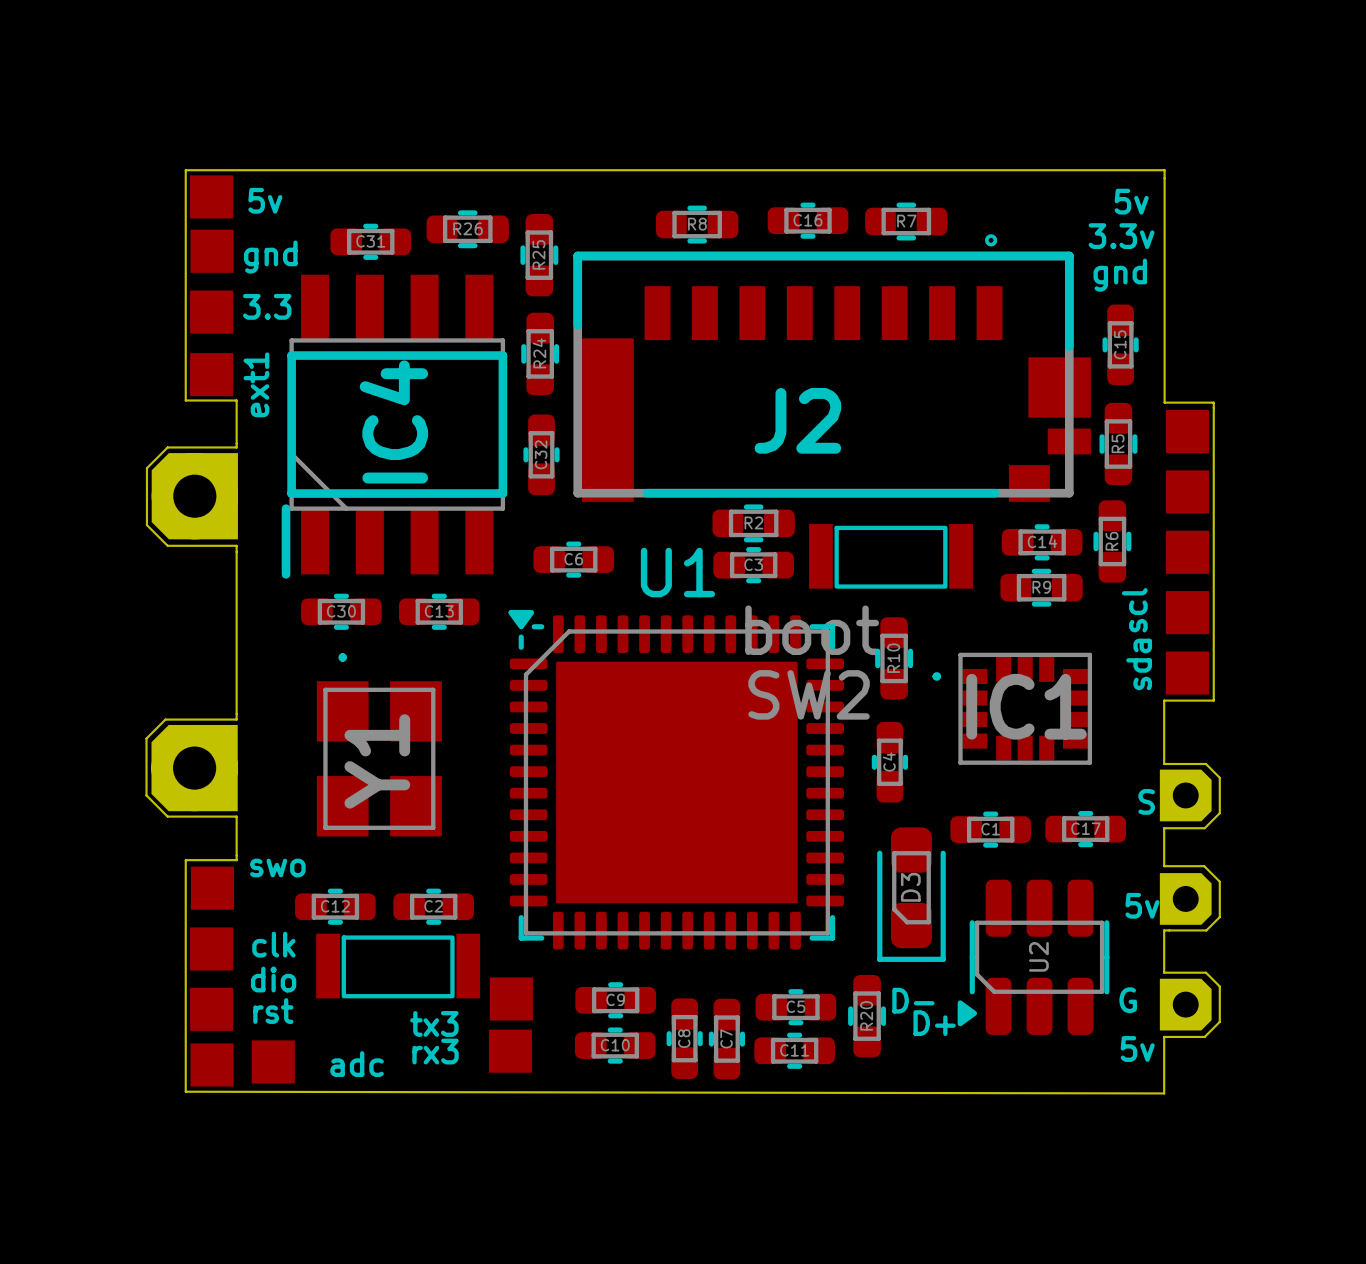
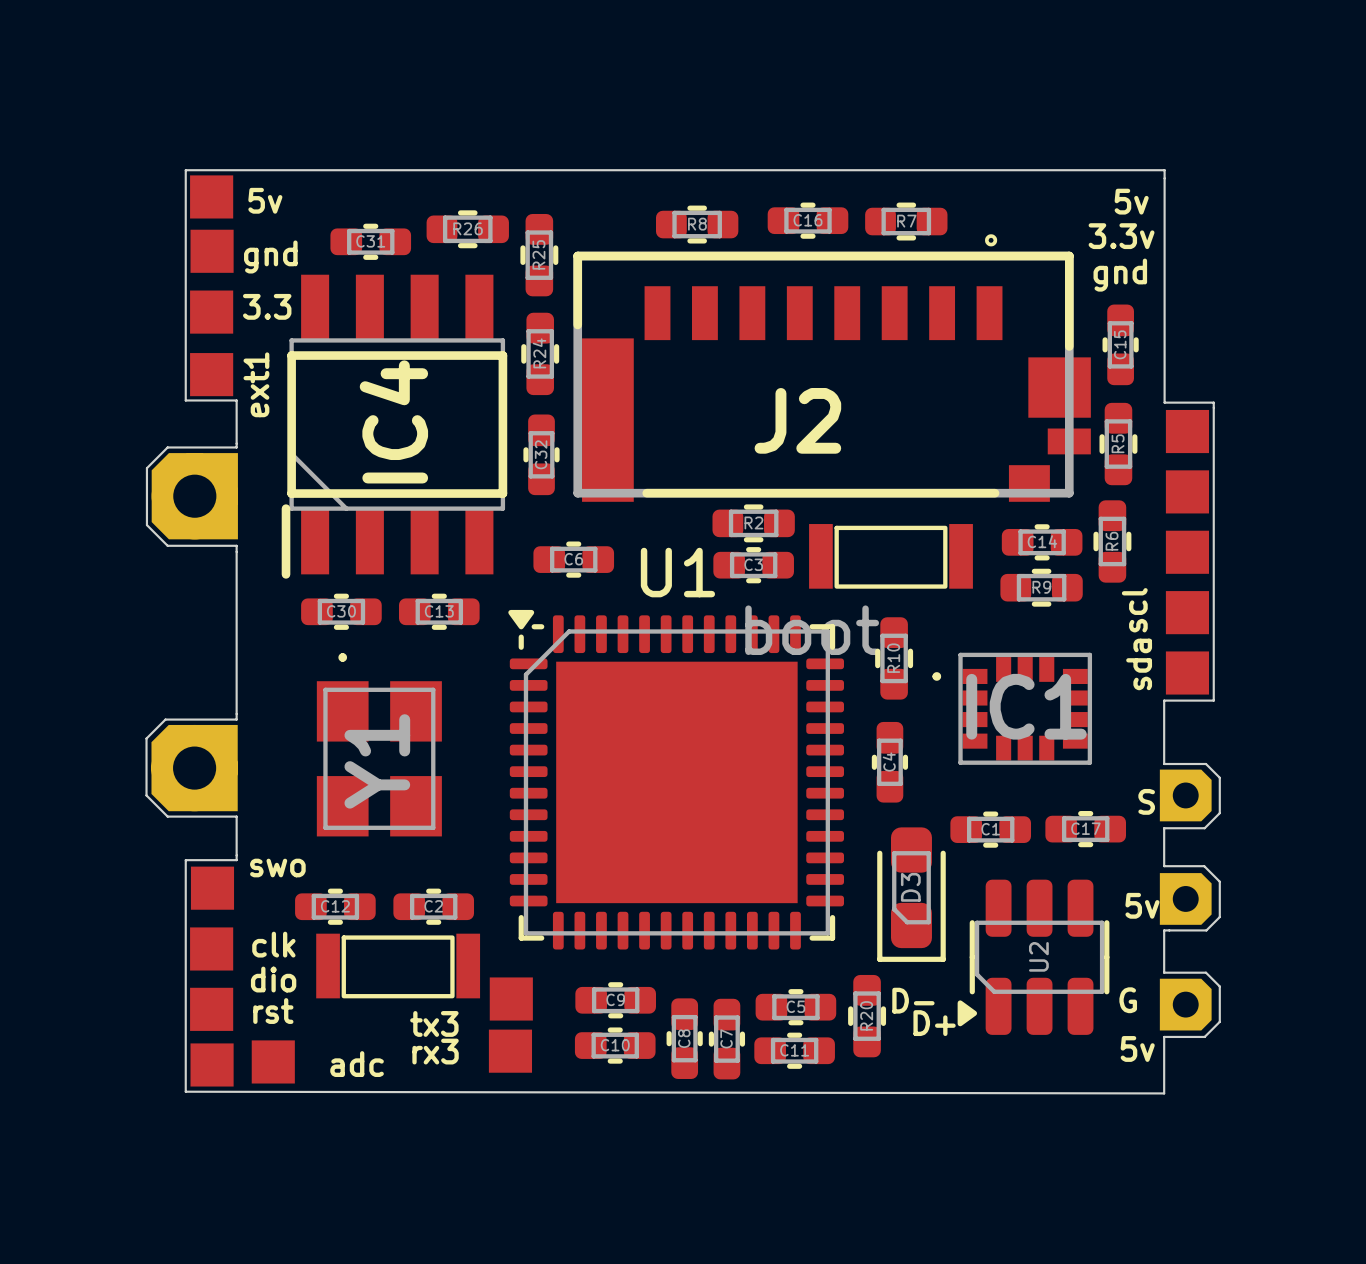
SW2 name: SW2 (809, 694) -> none

